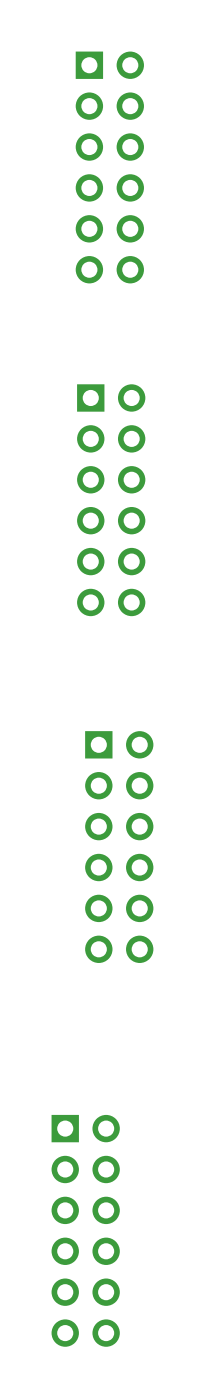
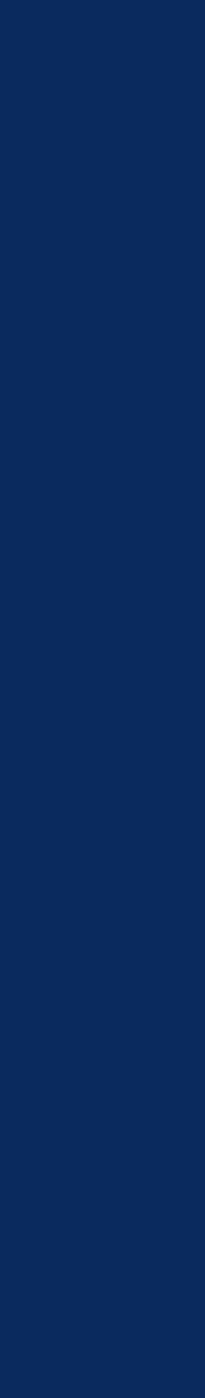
part: (109, 167) -> none
part: (111, 500) -> none
part: (119, 847) -> none
part: (85, 1230) -> none

